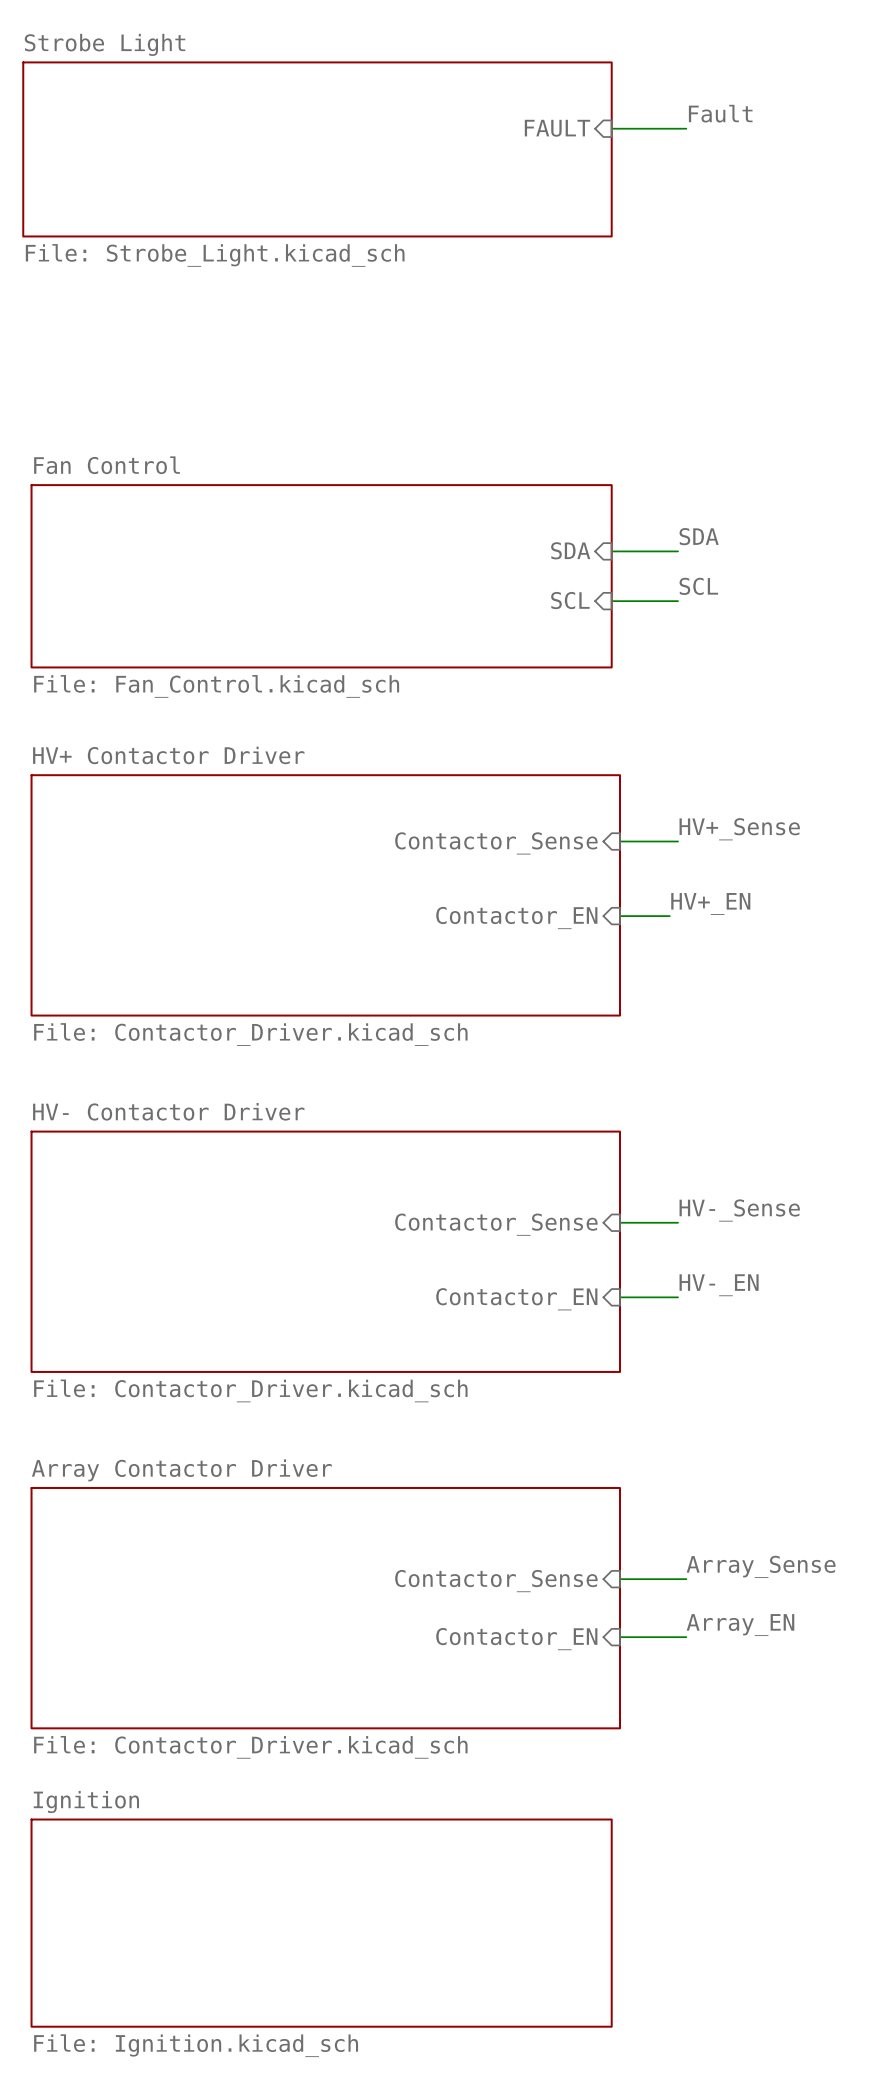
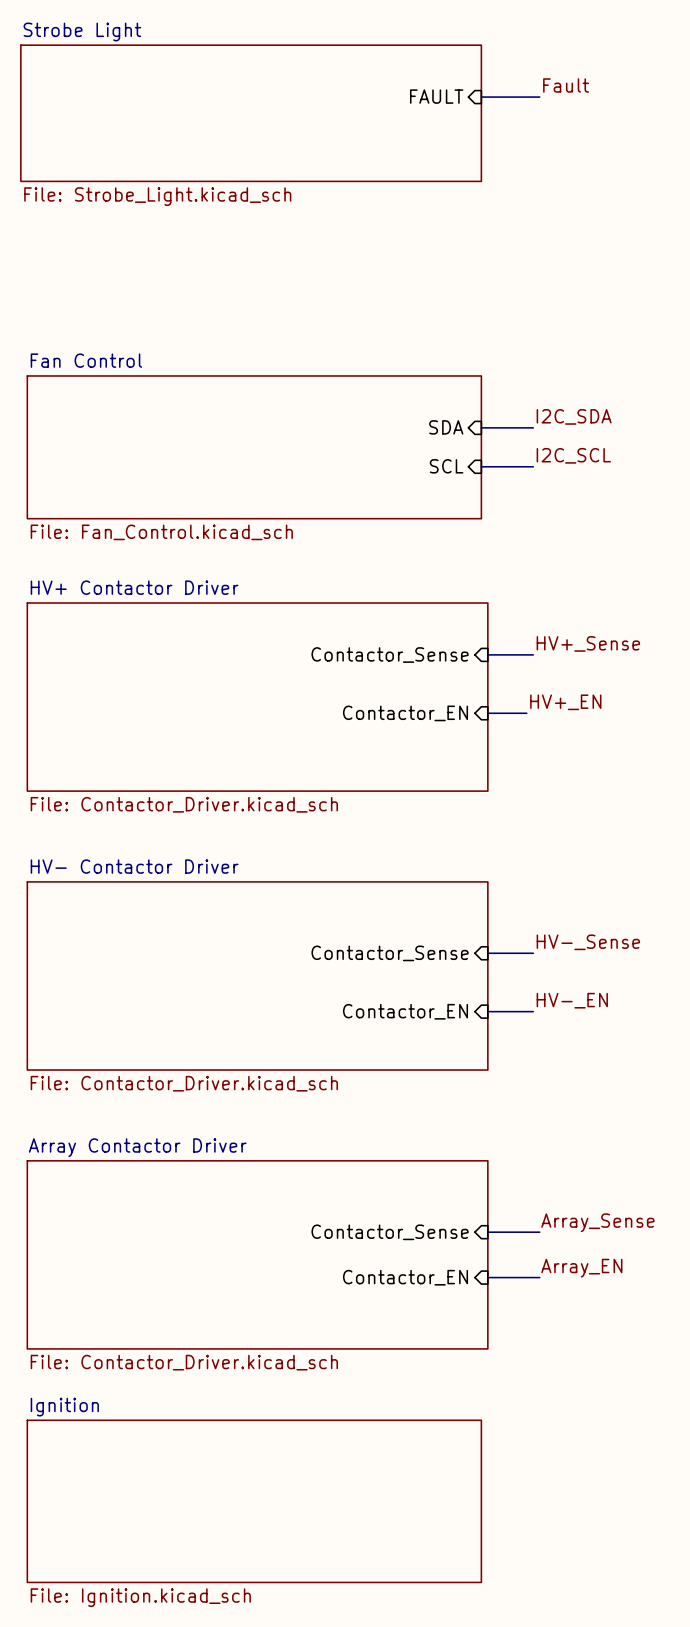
label: SDA (699, 536) -> I2C_SDA (574, 416)
label: SCL (698, 586) -> I2C_SCL (573, 455)

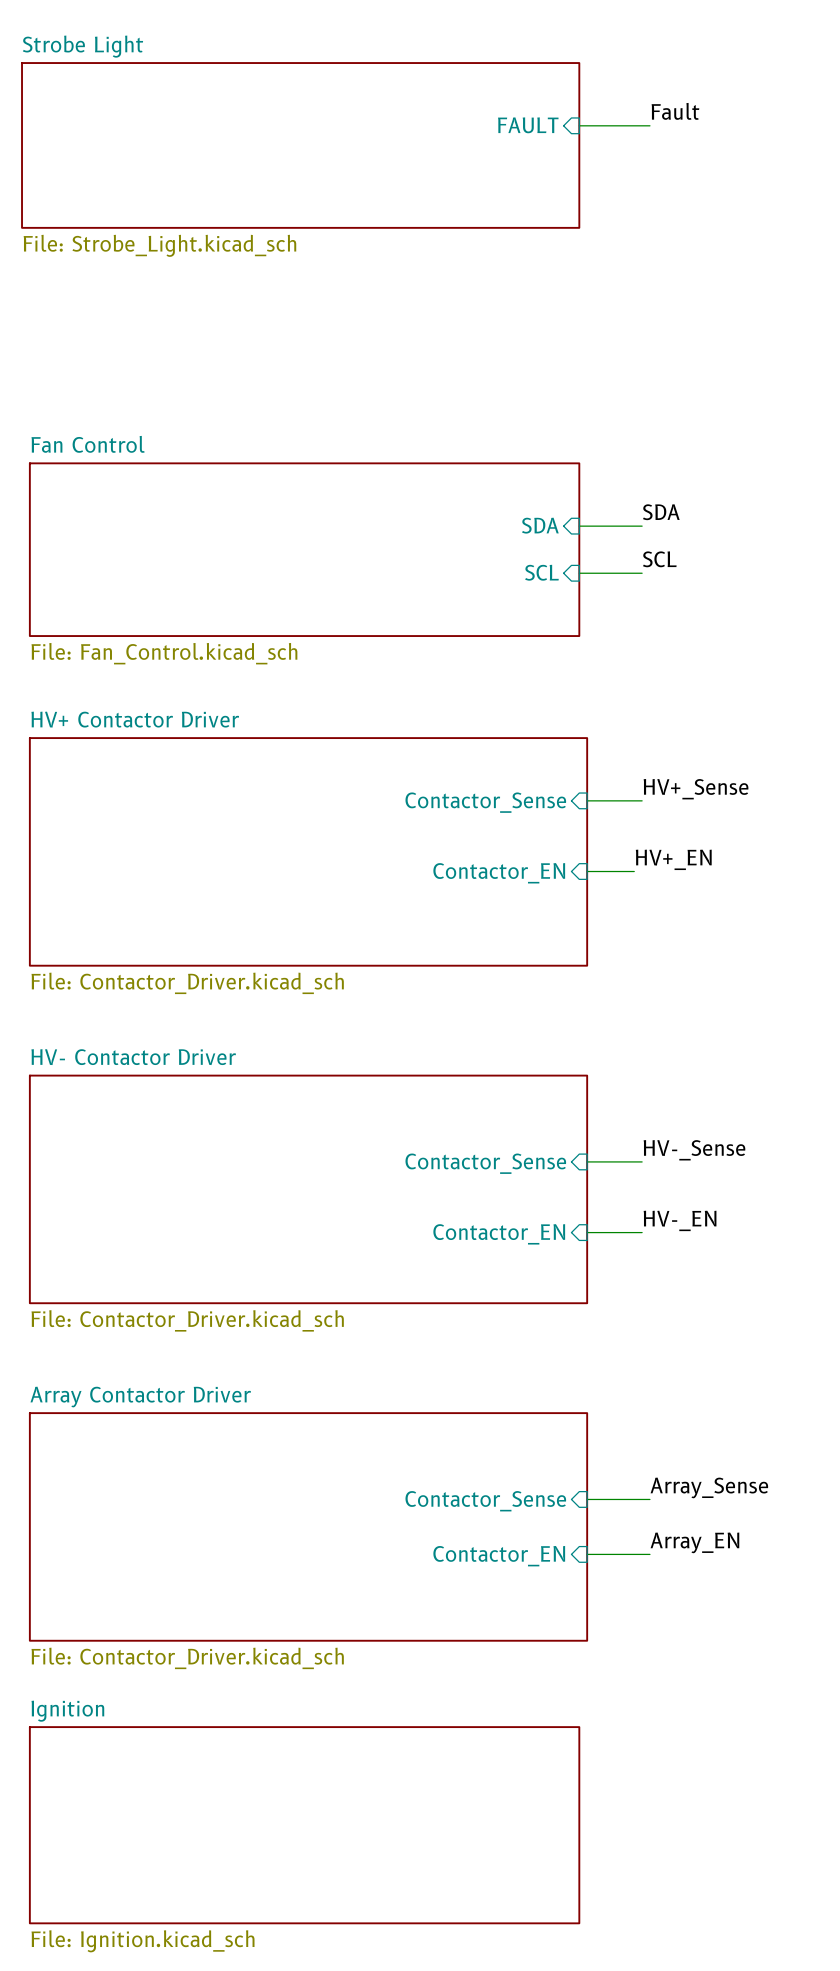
label: I2C_SDA (574, 416) -> SDA (661, 512)
label: I2C_SCL (573, 455) -> SCL (659, 559)

